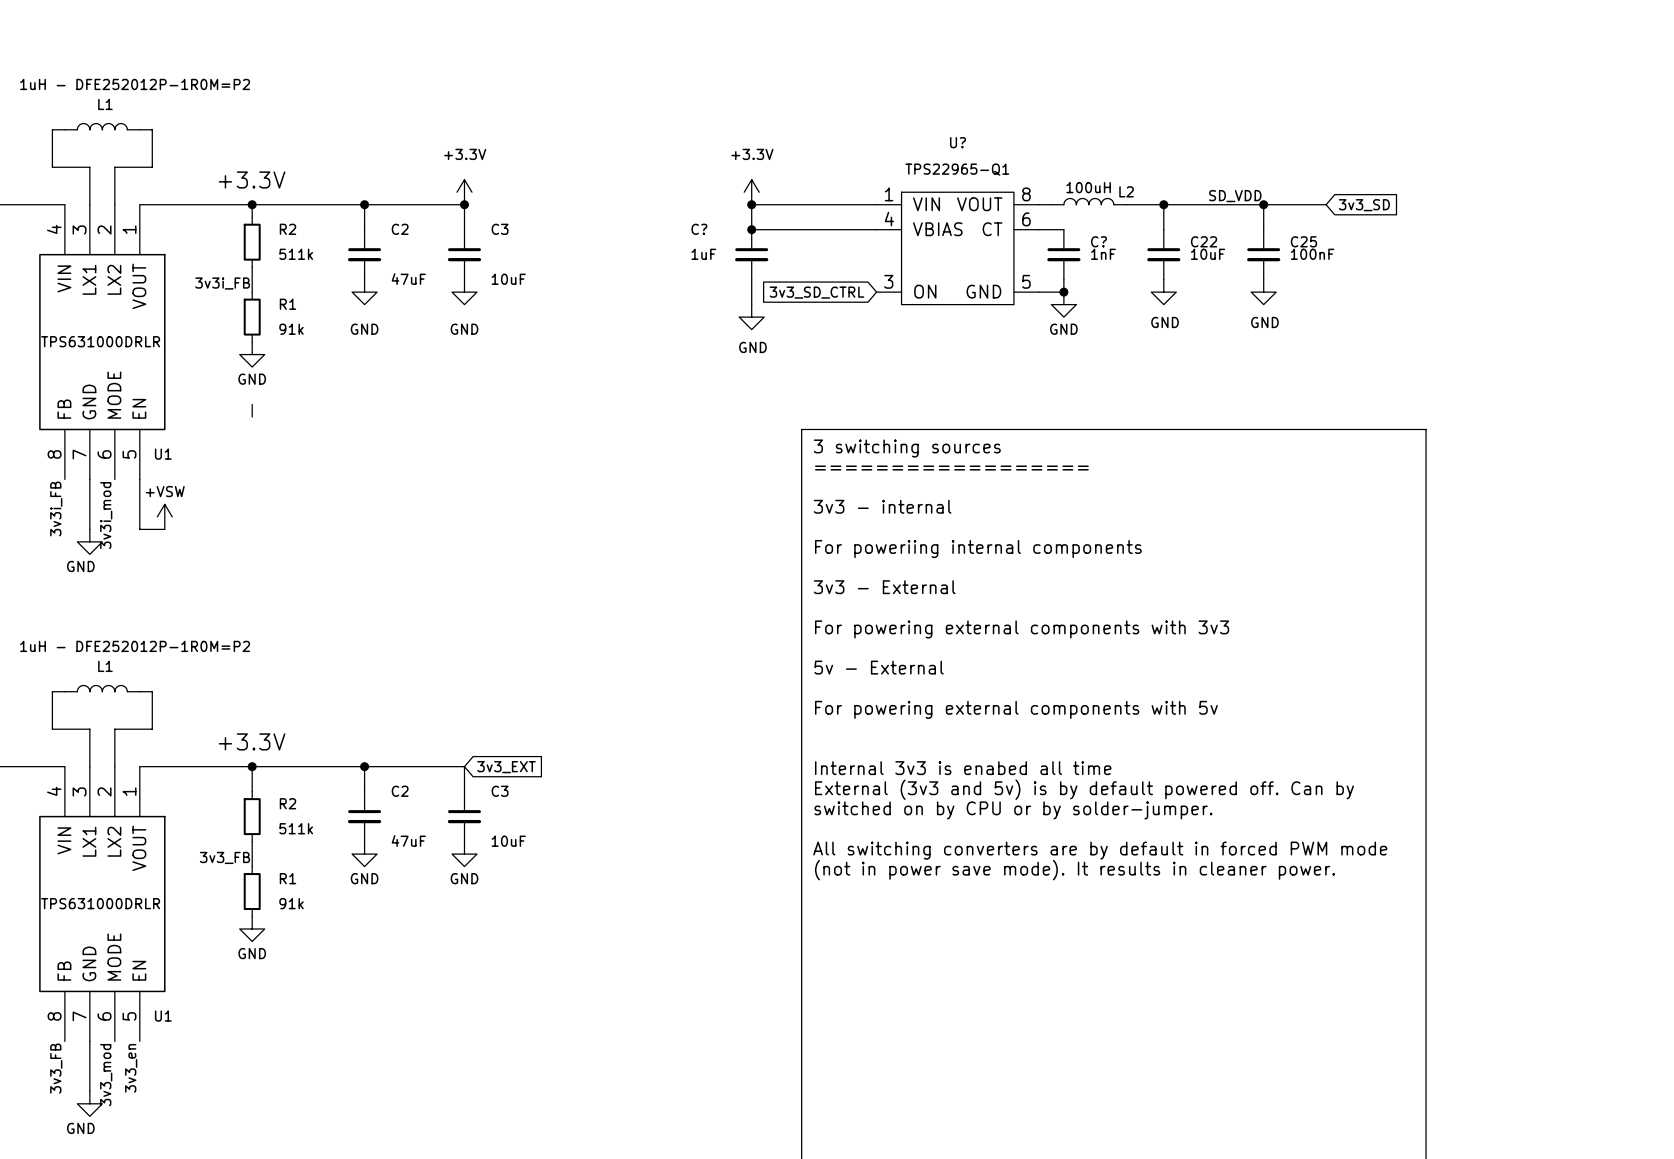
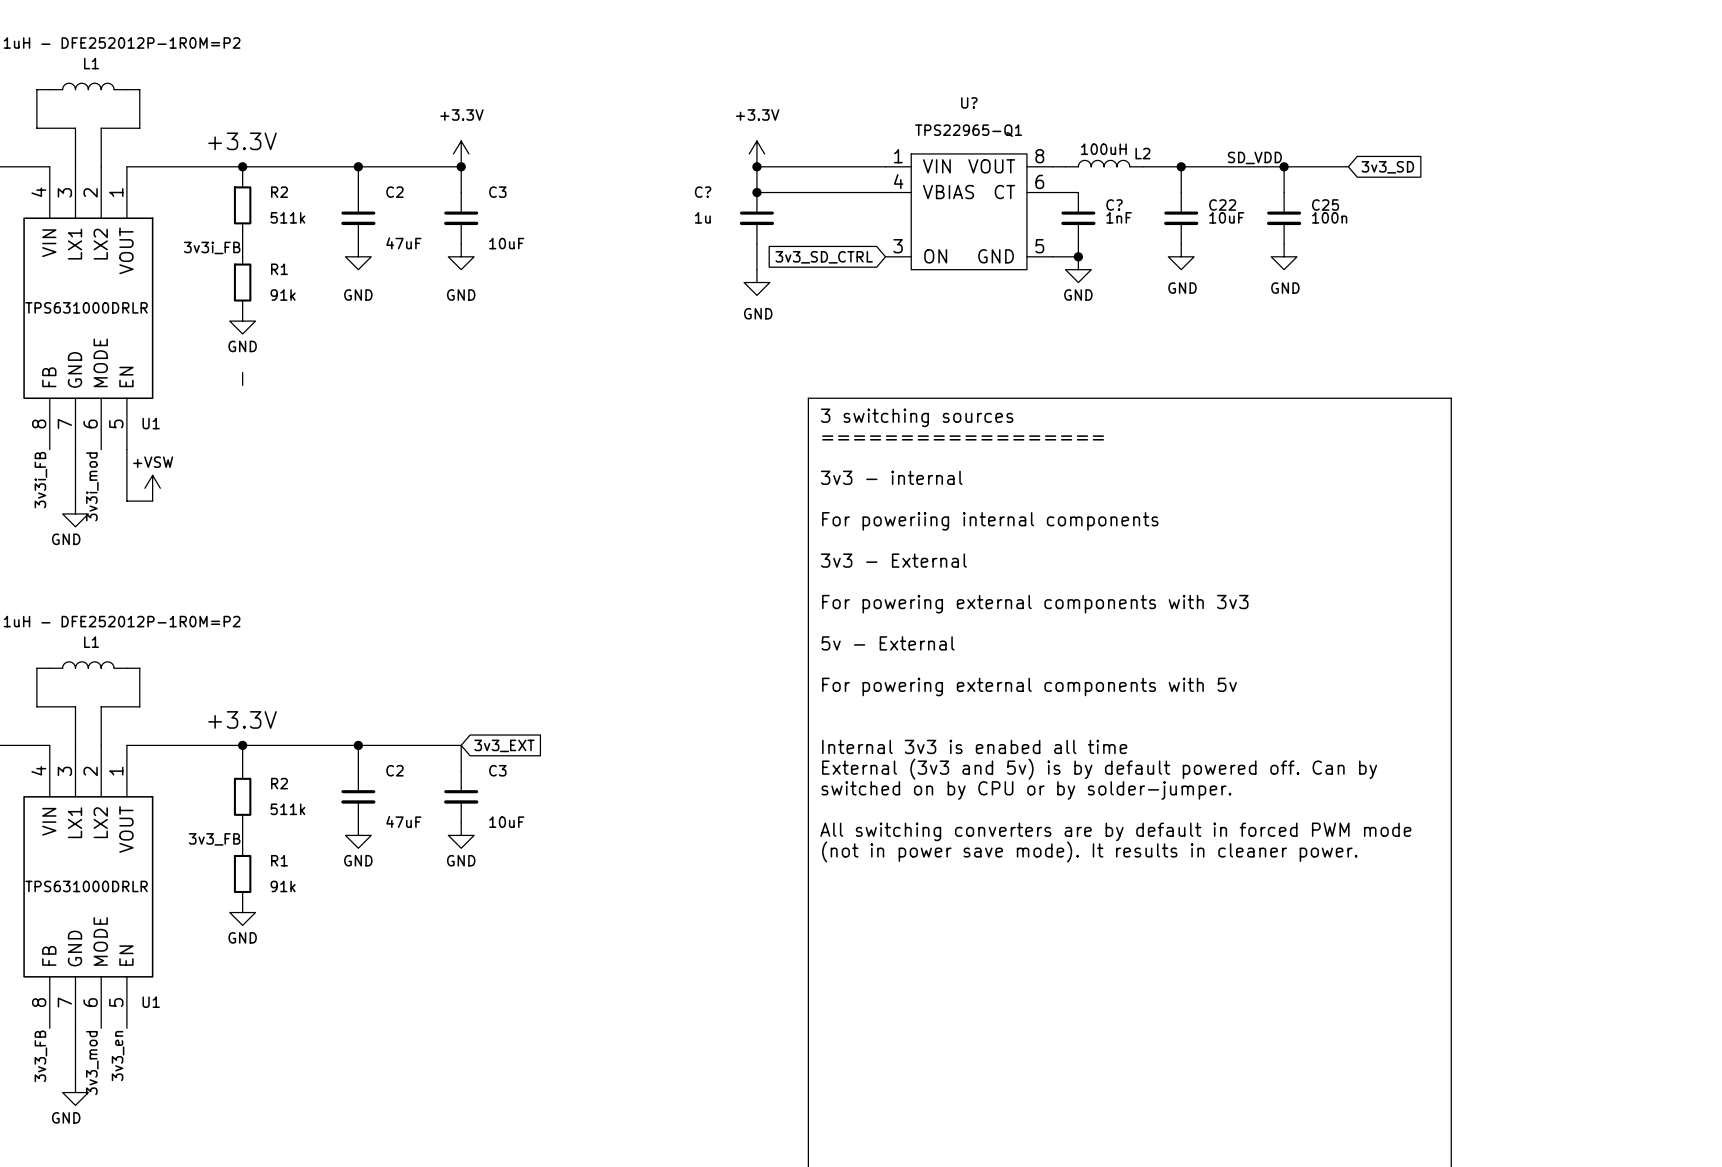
C? value: 1uF (703, 254) -> 1u (702, 217)
C25 value: 100nF (1312, 254) -> 100n (1329, 217)

